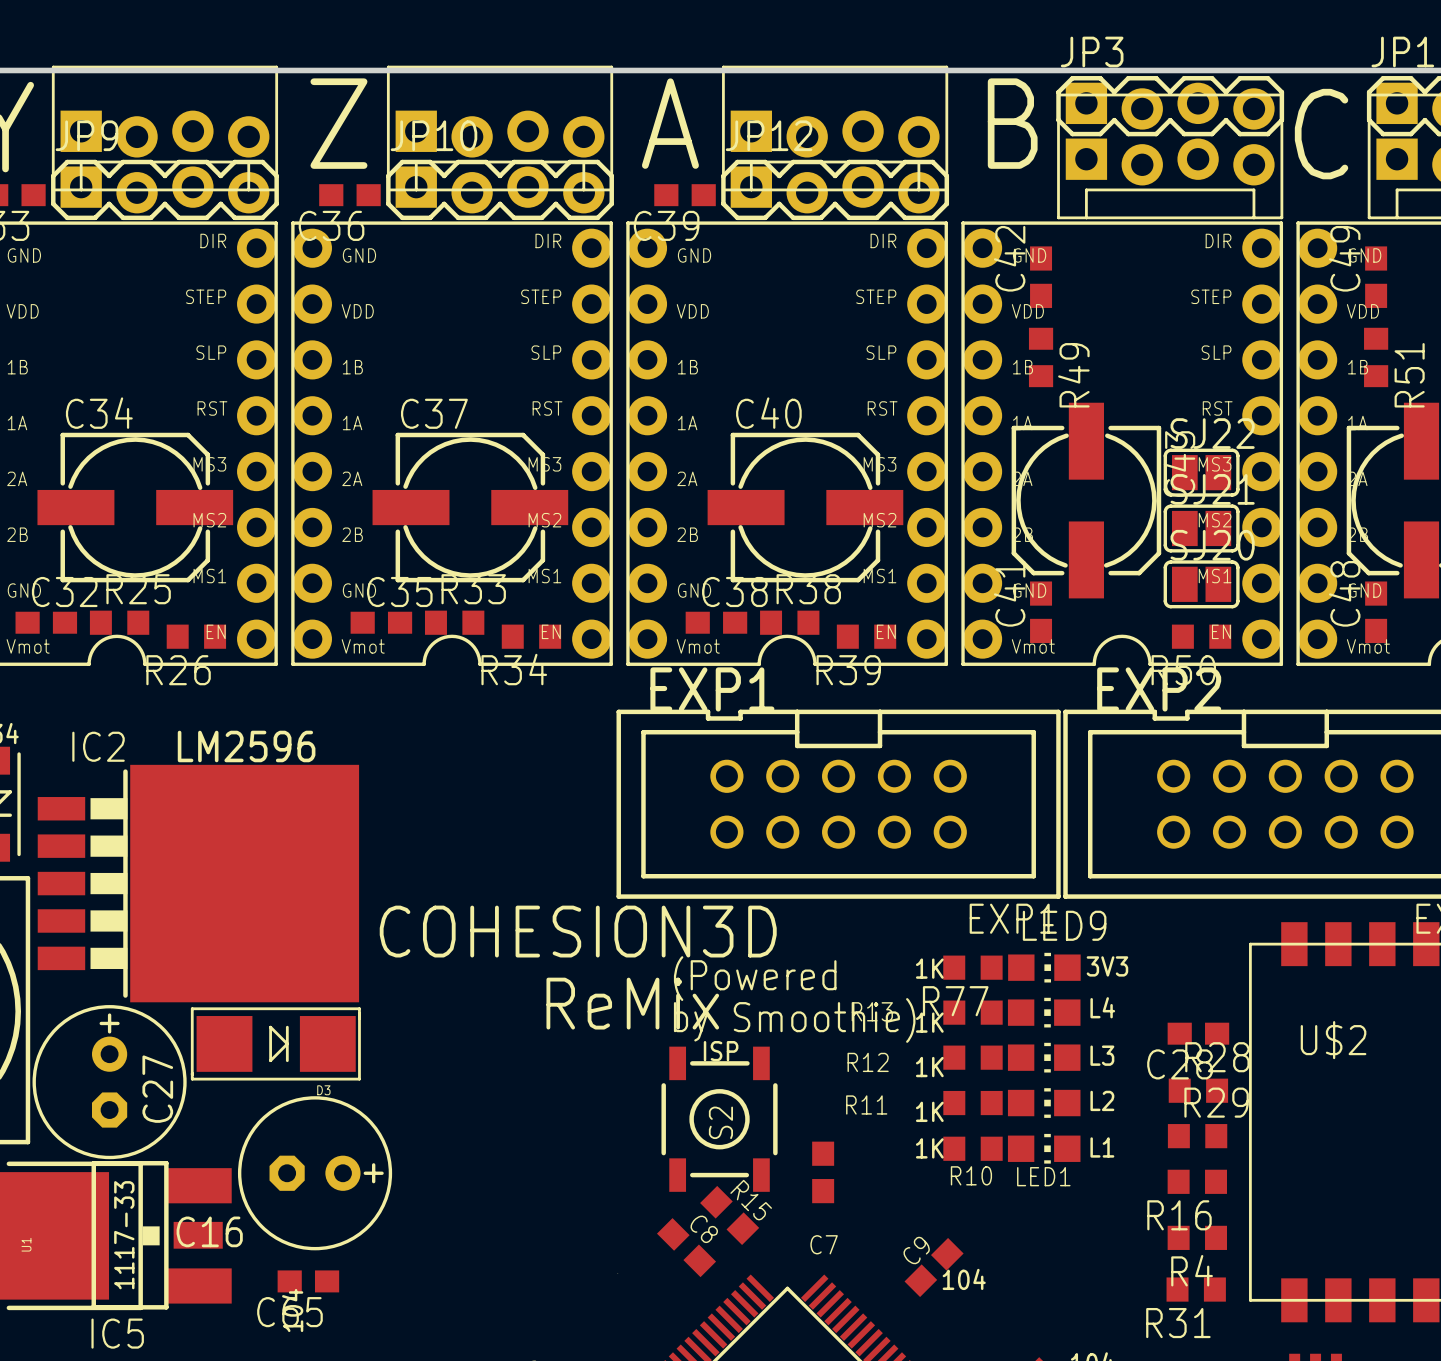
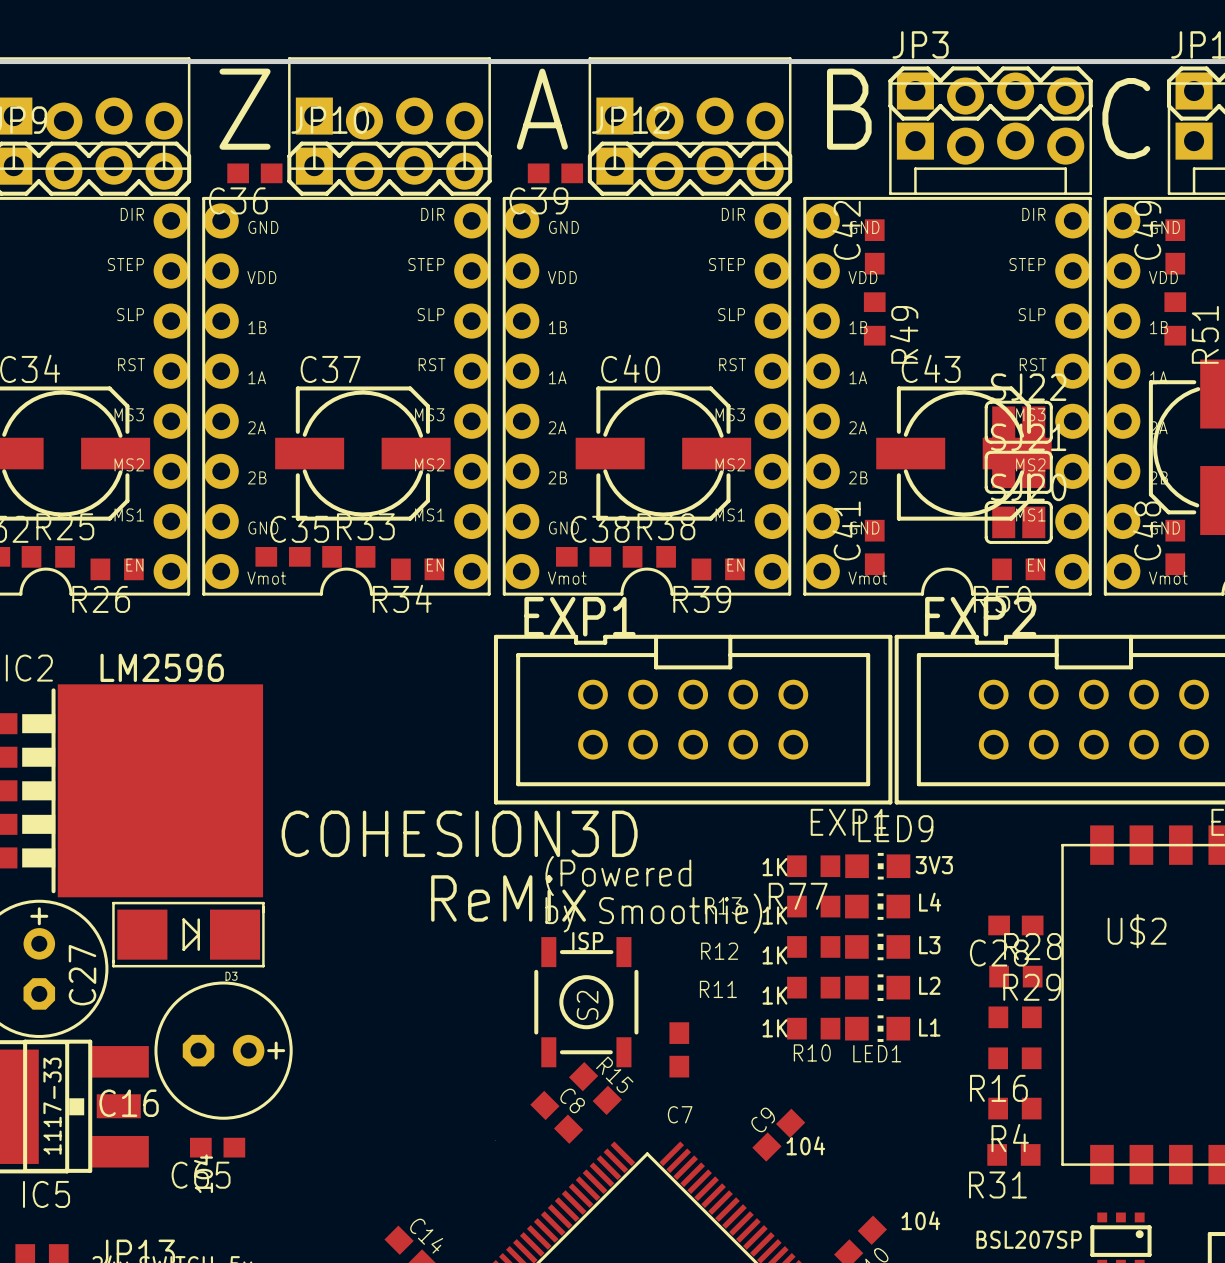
C43 rotation: 0° (1086, 500) -> 90° counterclockwise (963, 453)

